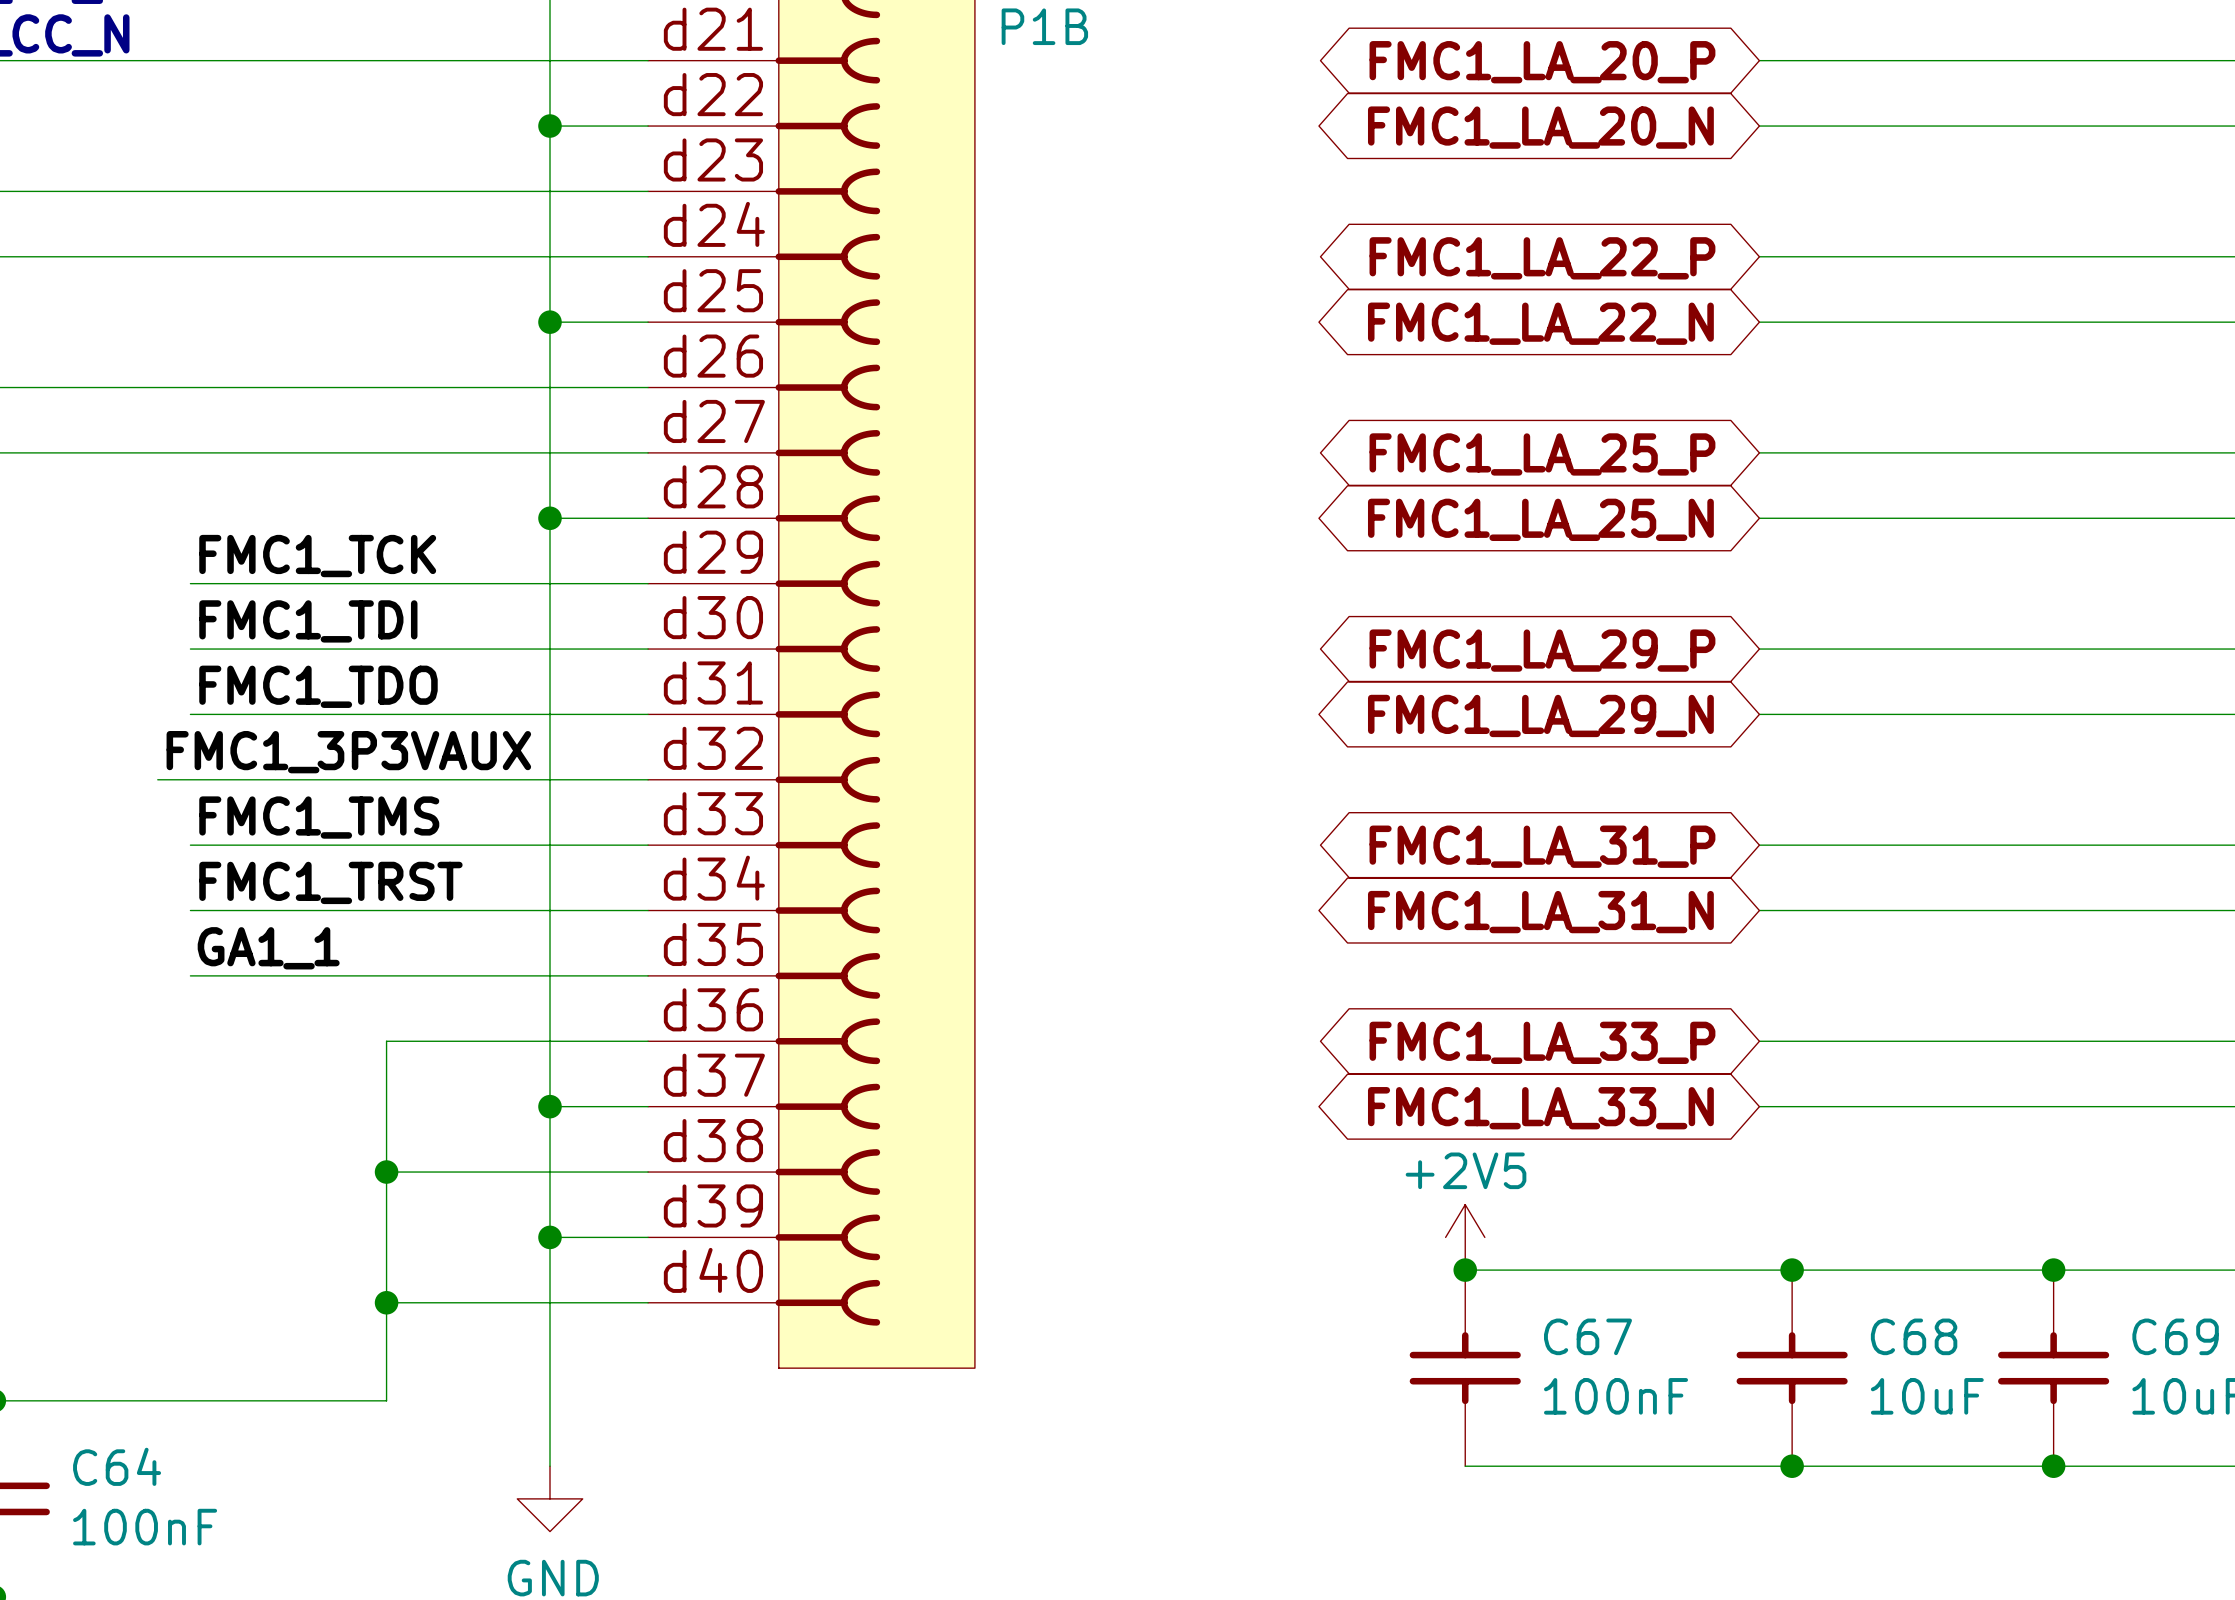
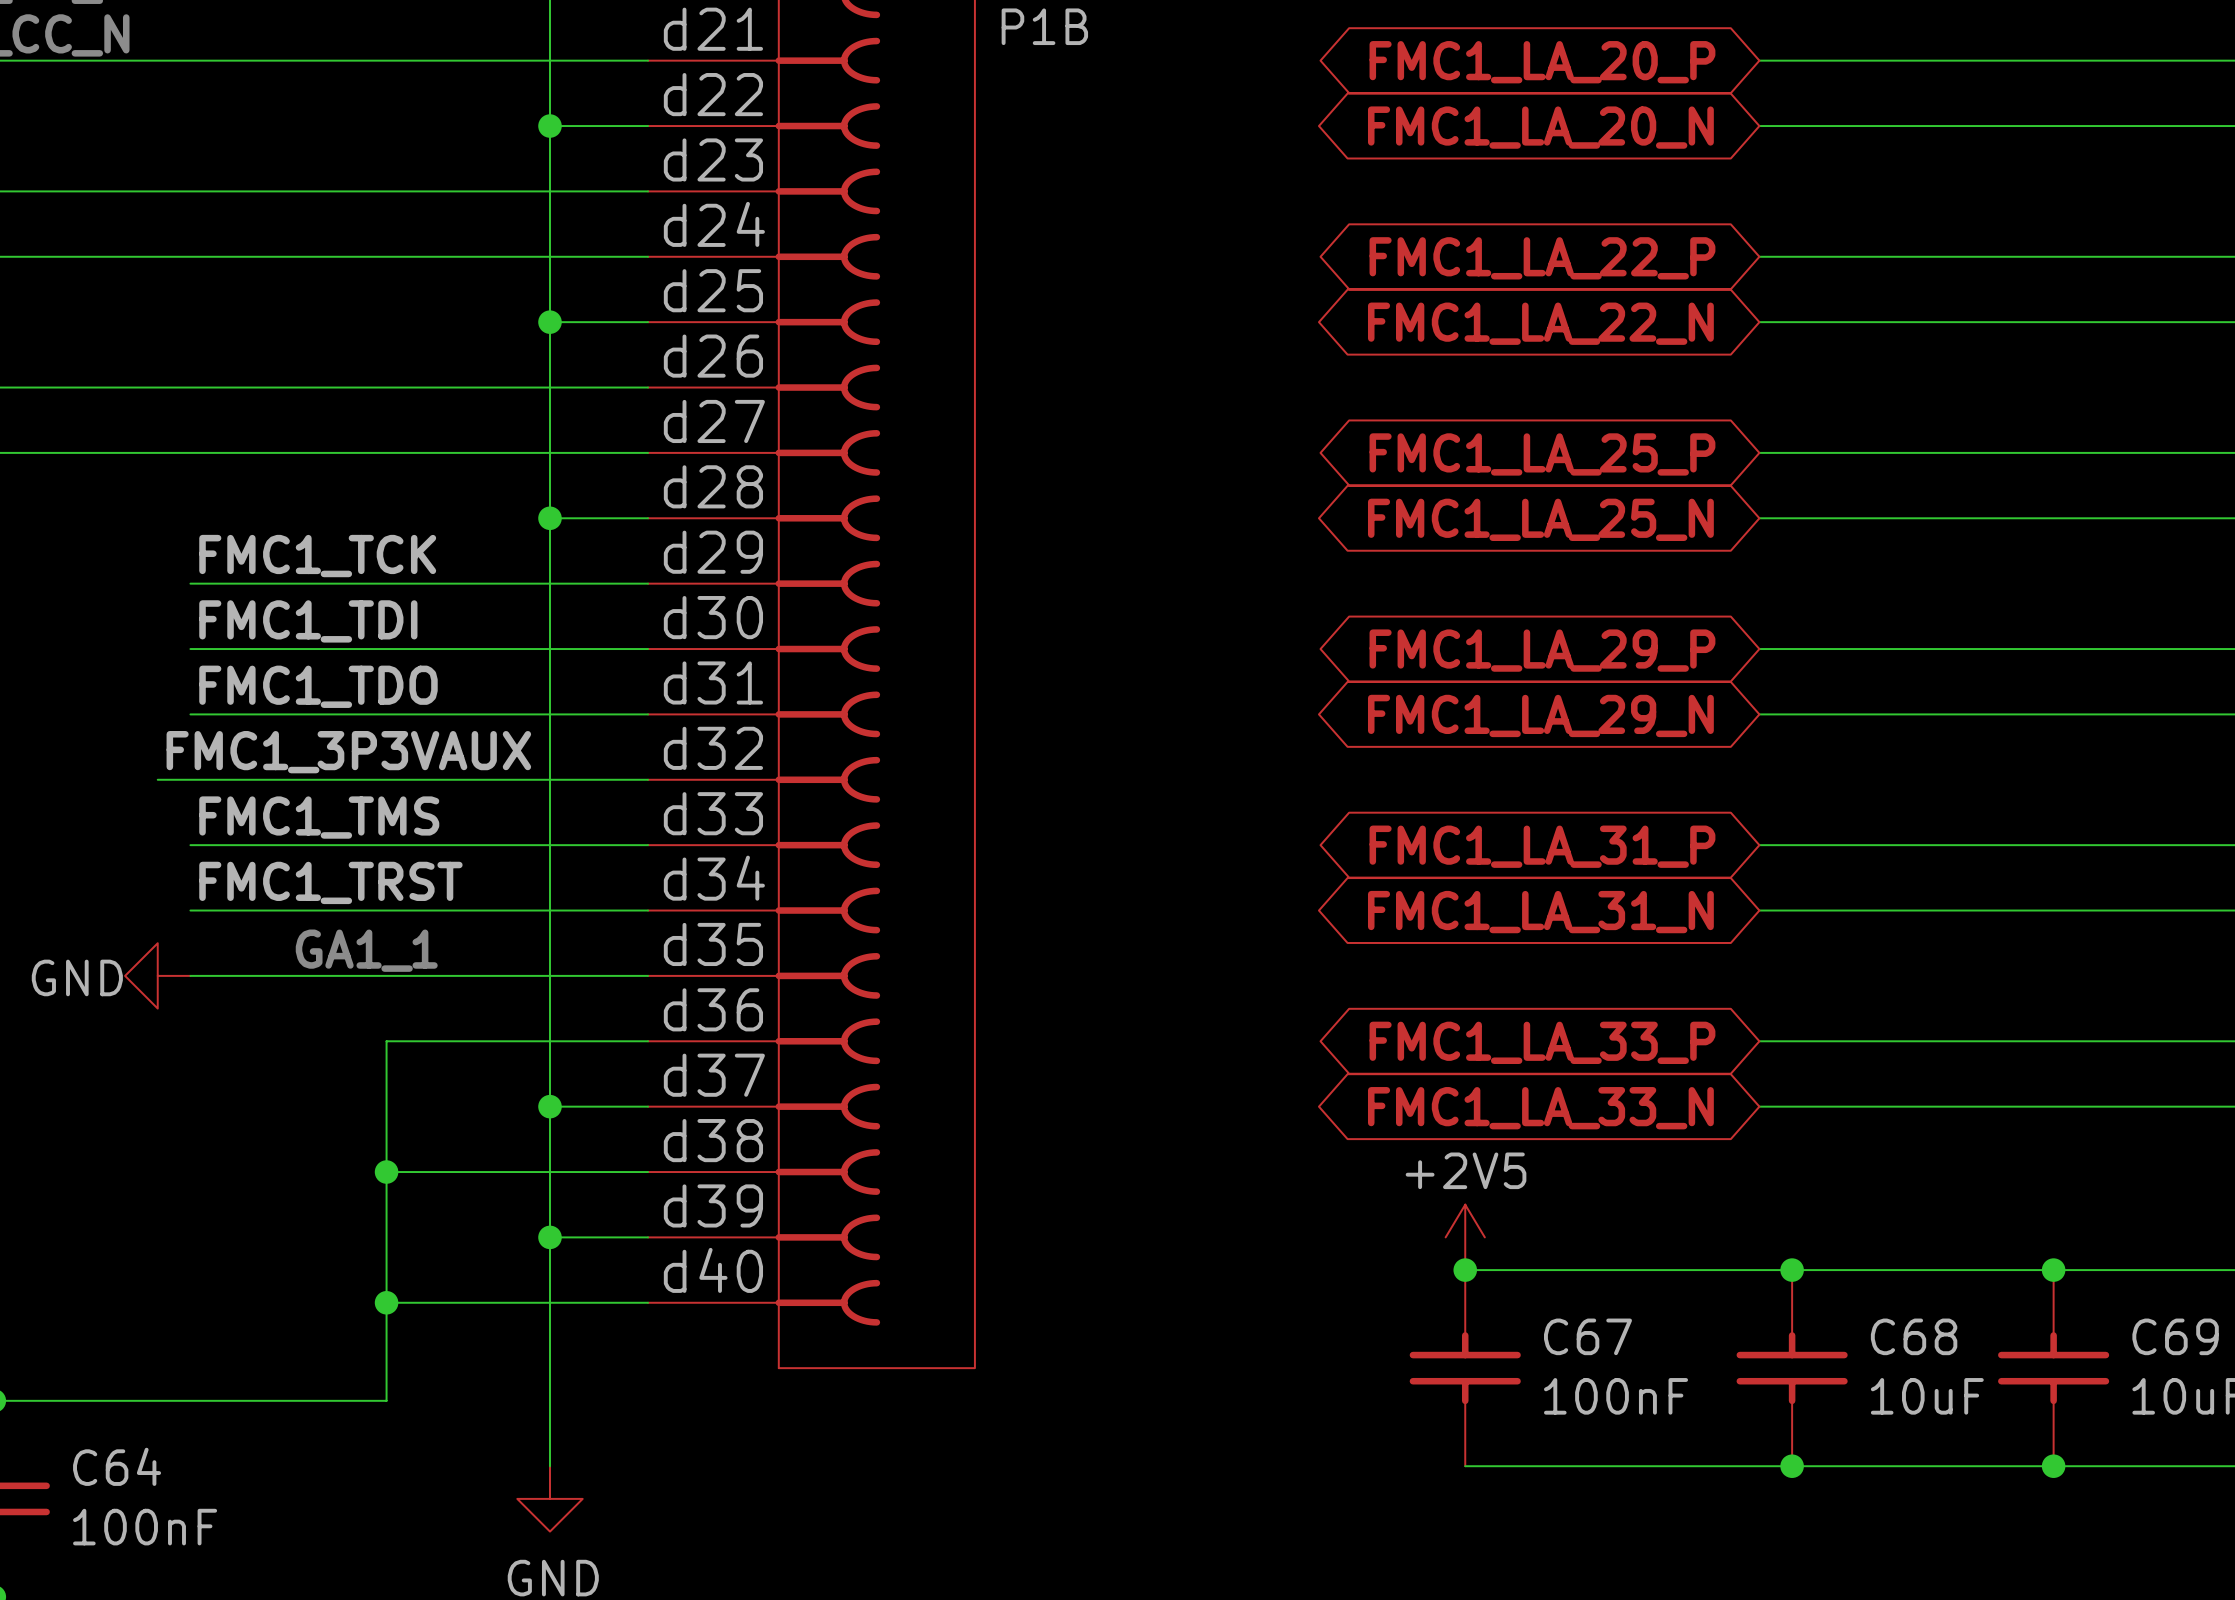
label: GA1_1 (268, 948) -> none
text: none -> GA1_1 (366, 950)
power symbol: none -> GND (157, 975)

